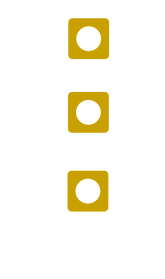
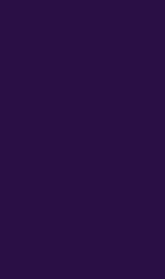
part: (88, 38) -> none
part: (88, 112) -> none
part: (87, 191) -> none

